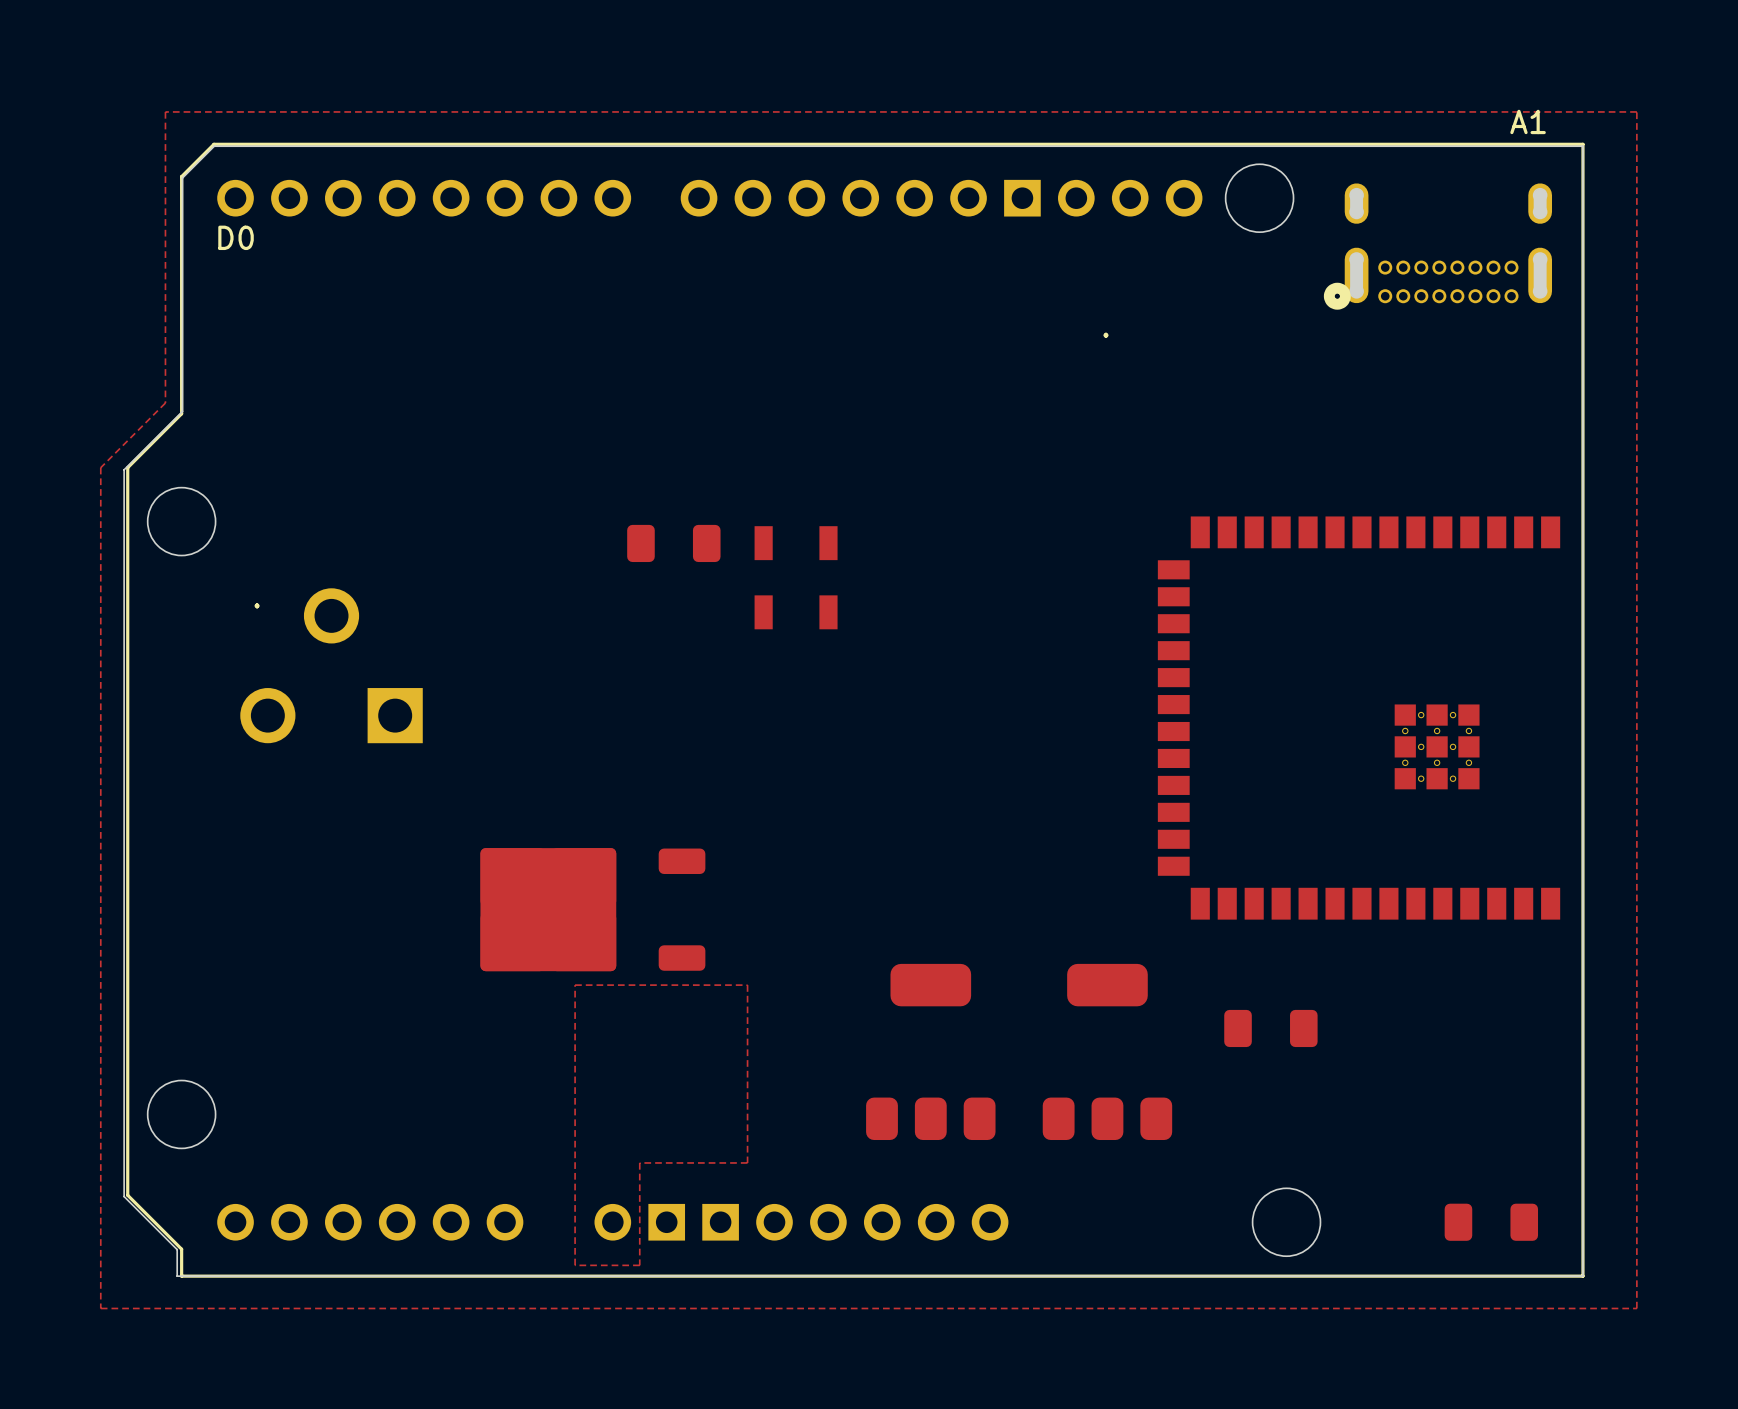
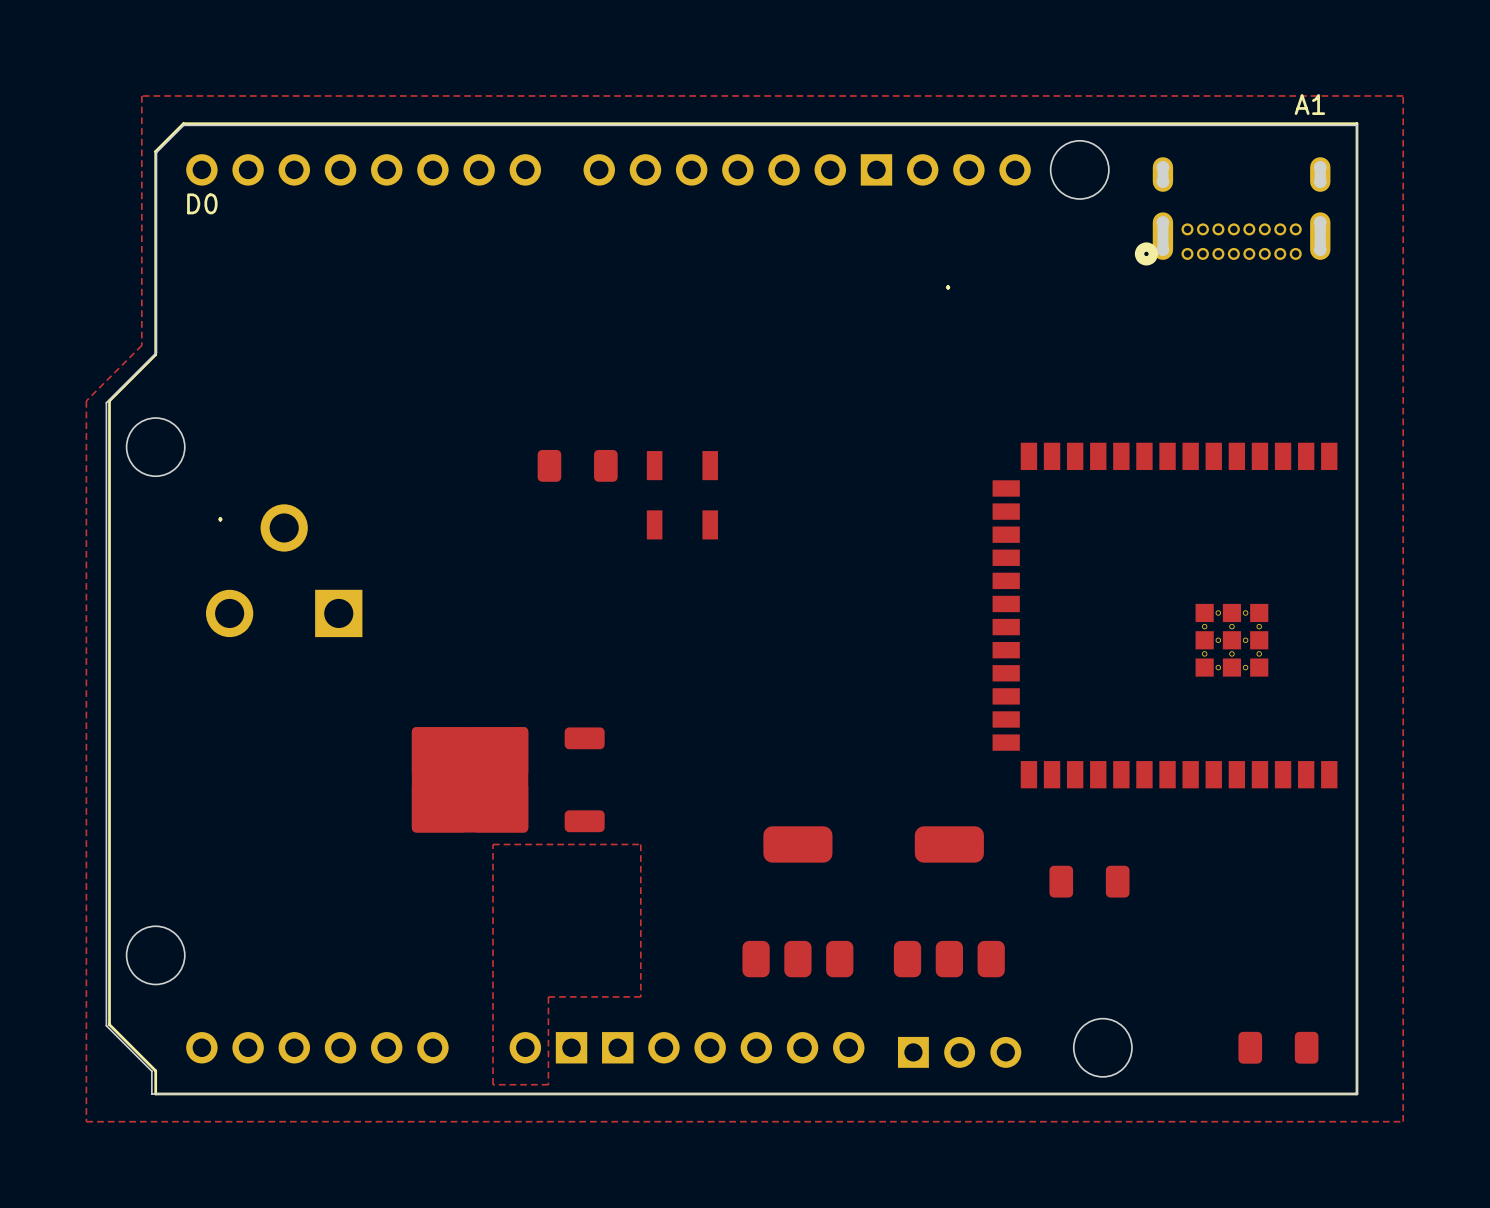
part: none -> (959, 1052)

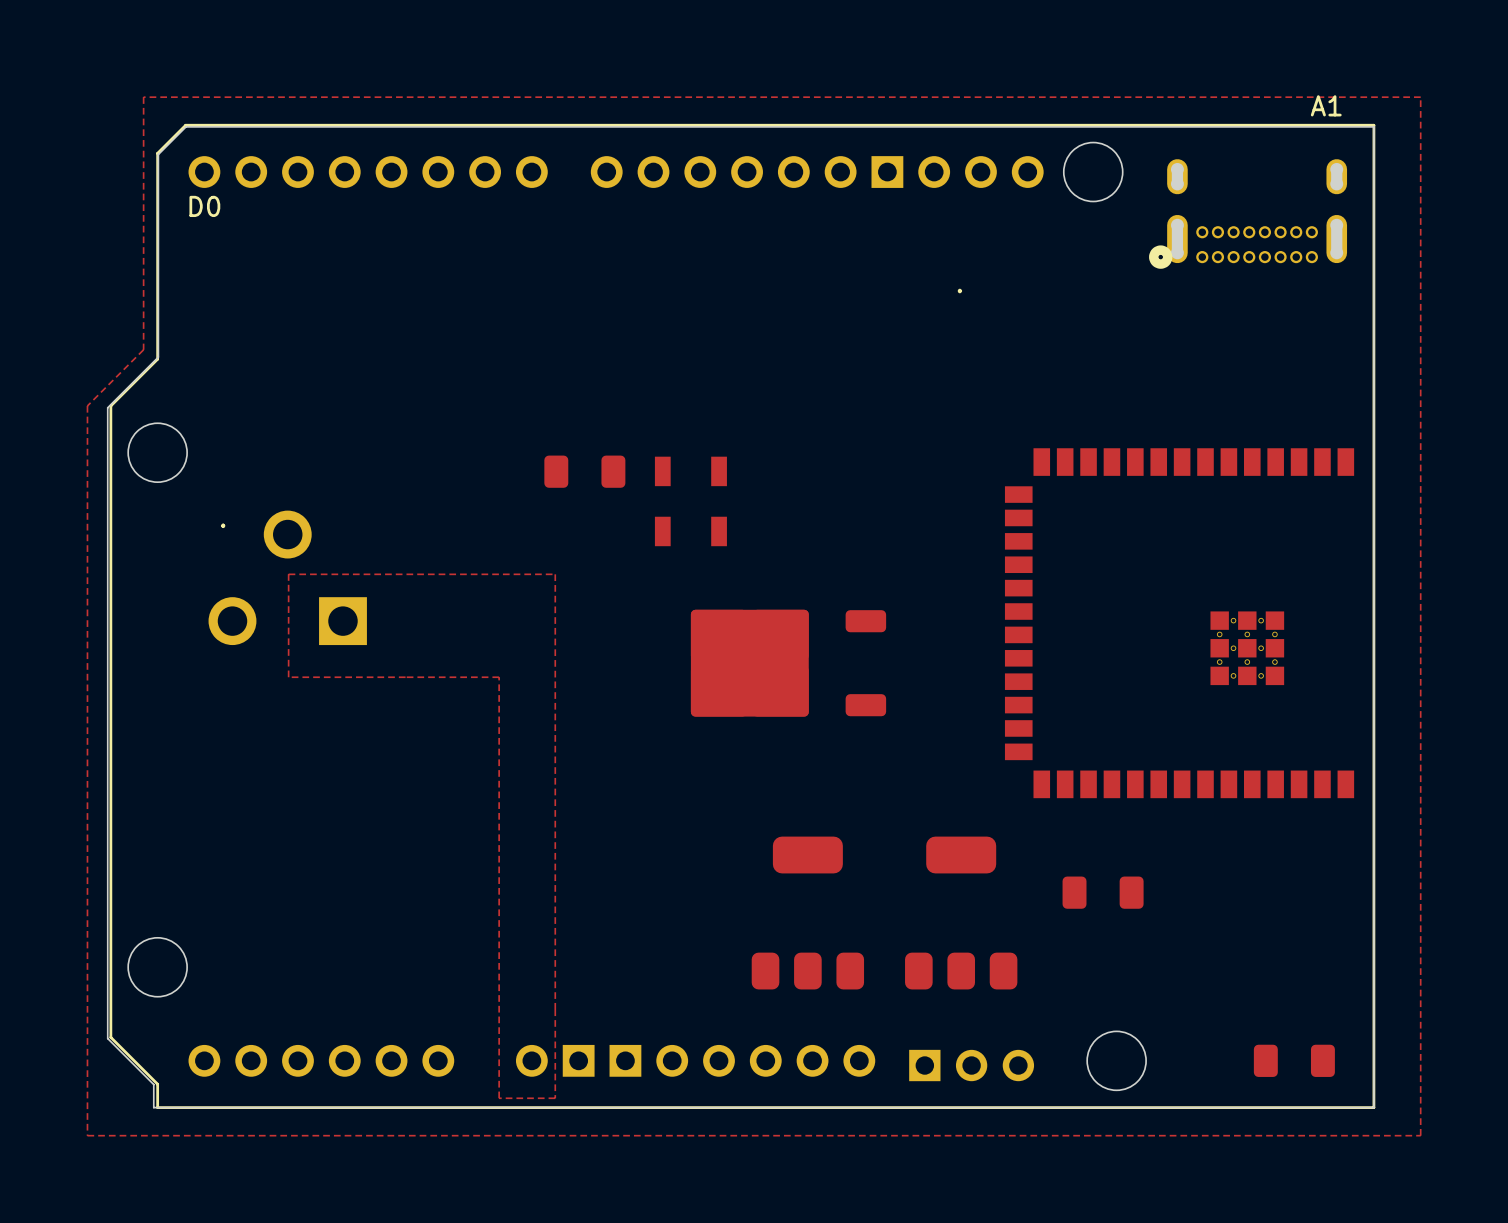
part position: (508, 779) -> (788, 663)
top zone outline: (492, 844) (640, 844) (640, 996) (548, 996) -> (499, 855) (499, 677) (288, 677) (288, 574) (555, 574) (555, 1009)

